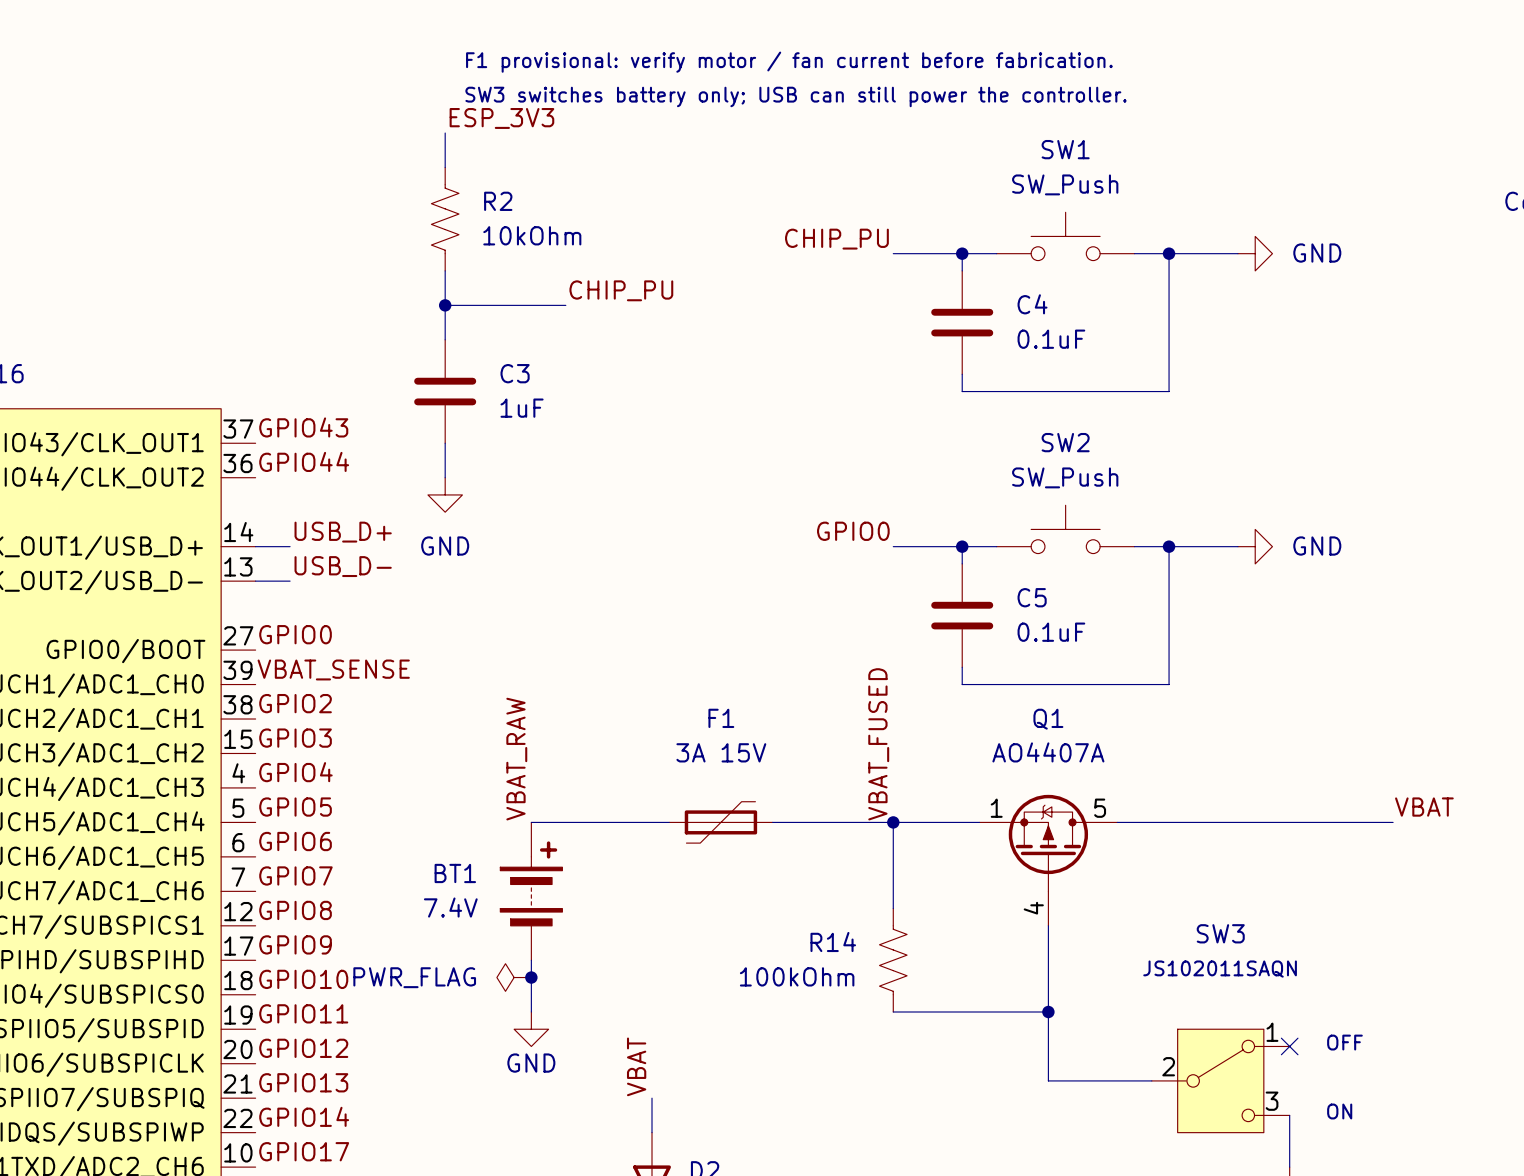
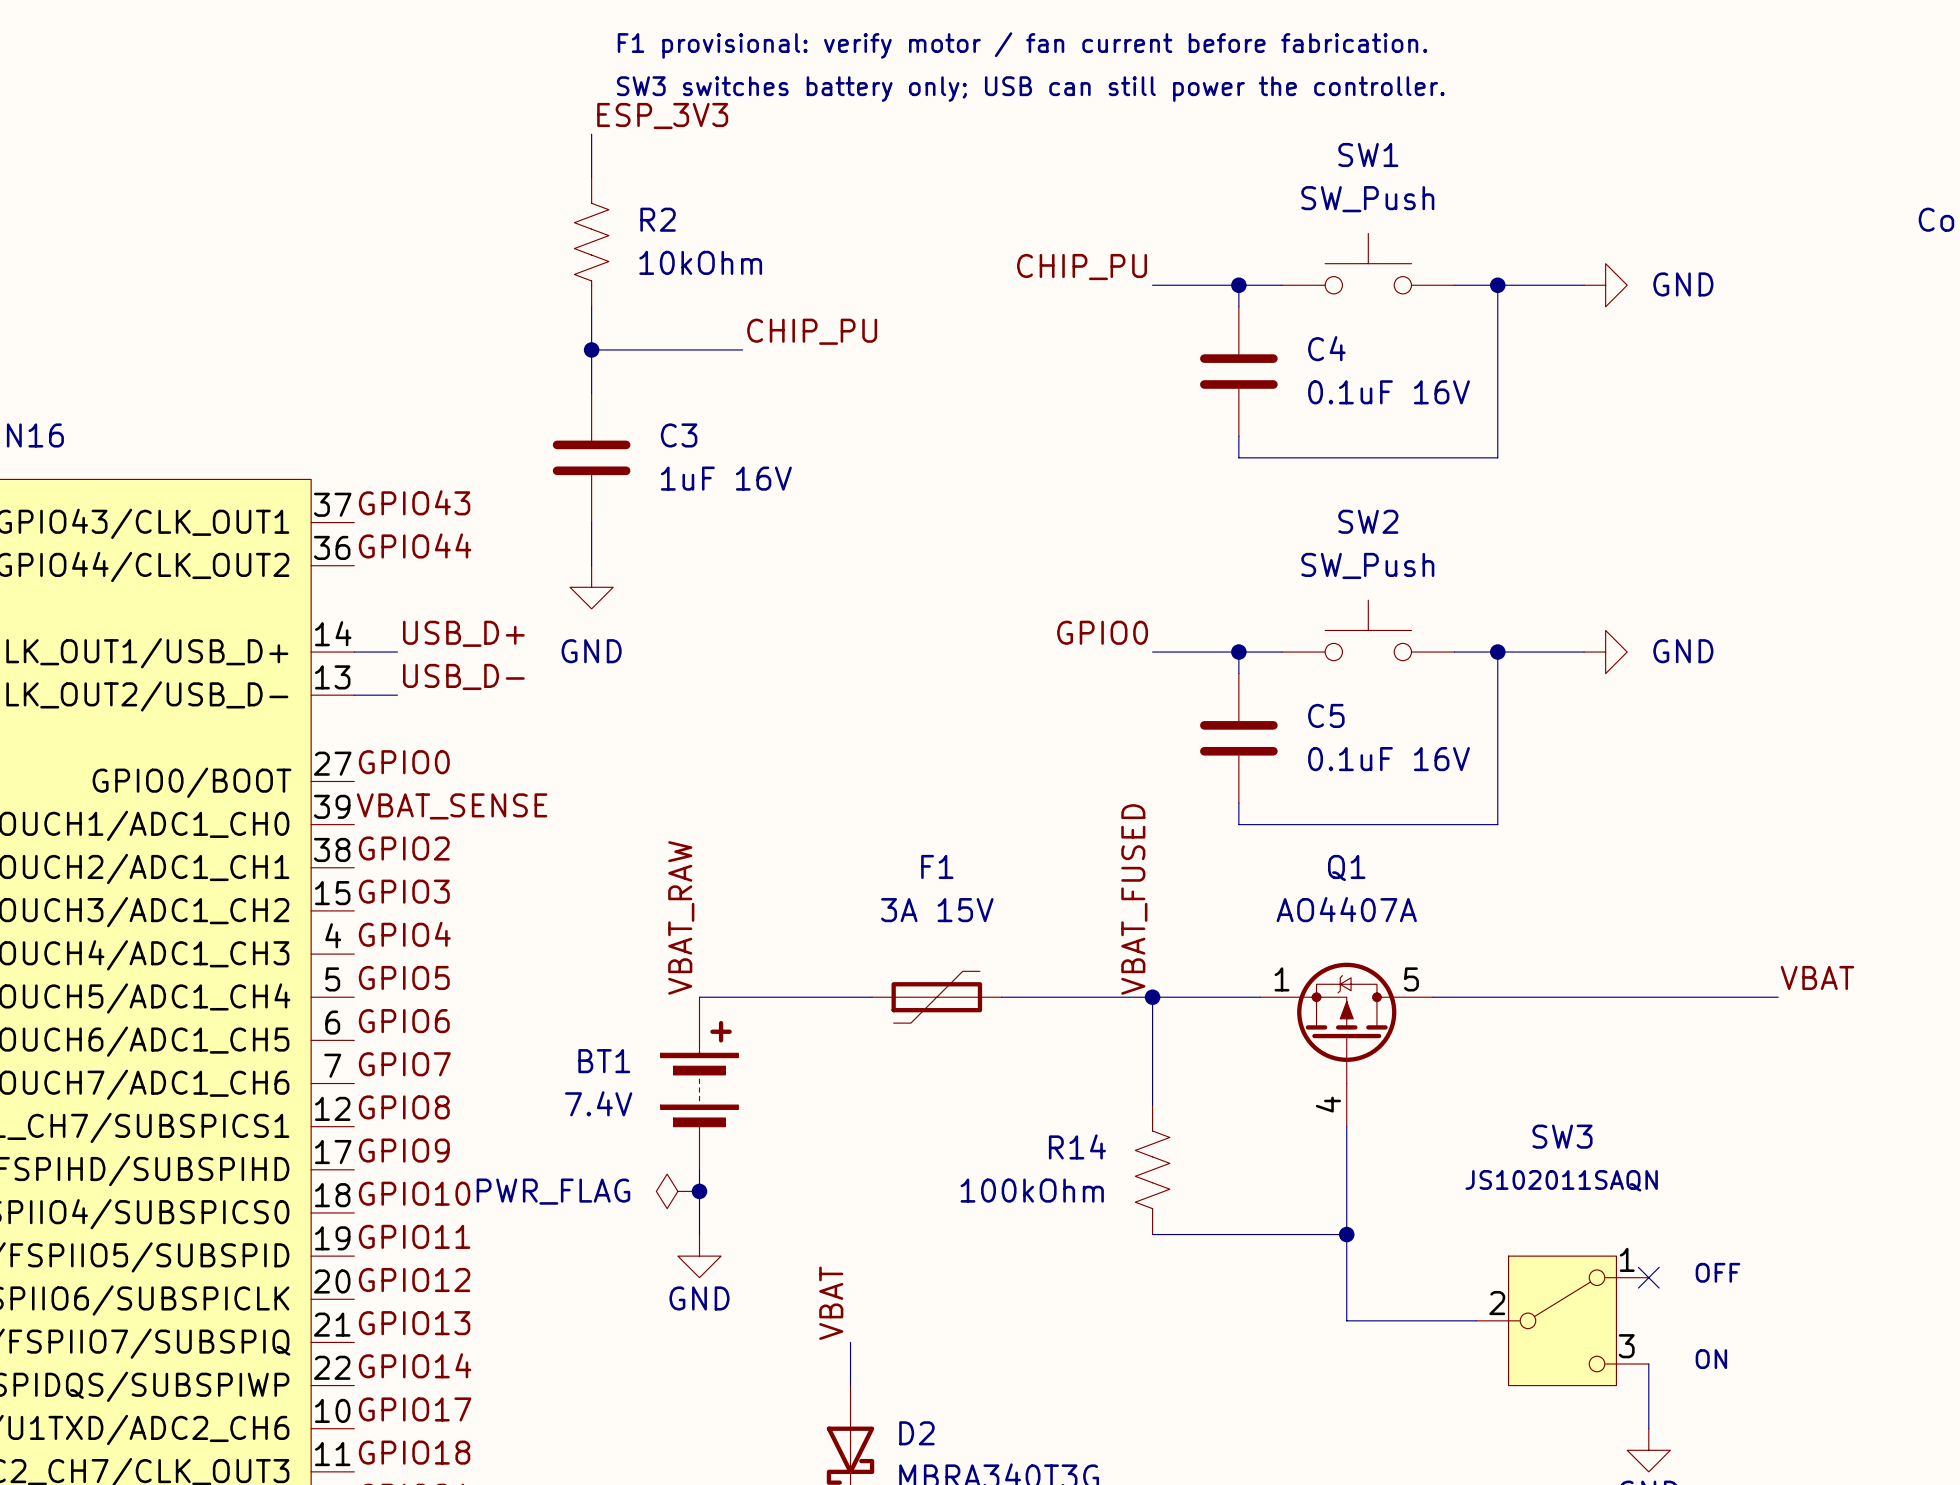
C4 value: 0.1uF (1051, 339) -> 0.1uF 16V (1389, 392)
C3 value: 1uF (522, 408) -> 1uF 16V (726, 478)
C5 value: 0.1uF (1051, 632) -> 0.1uF 16V (1389, 759)

